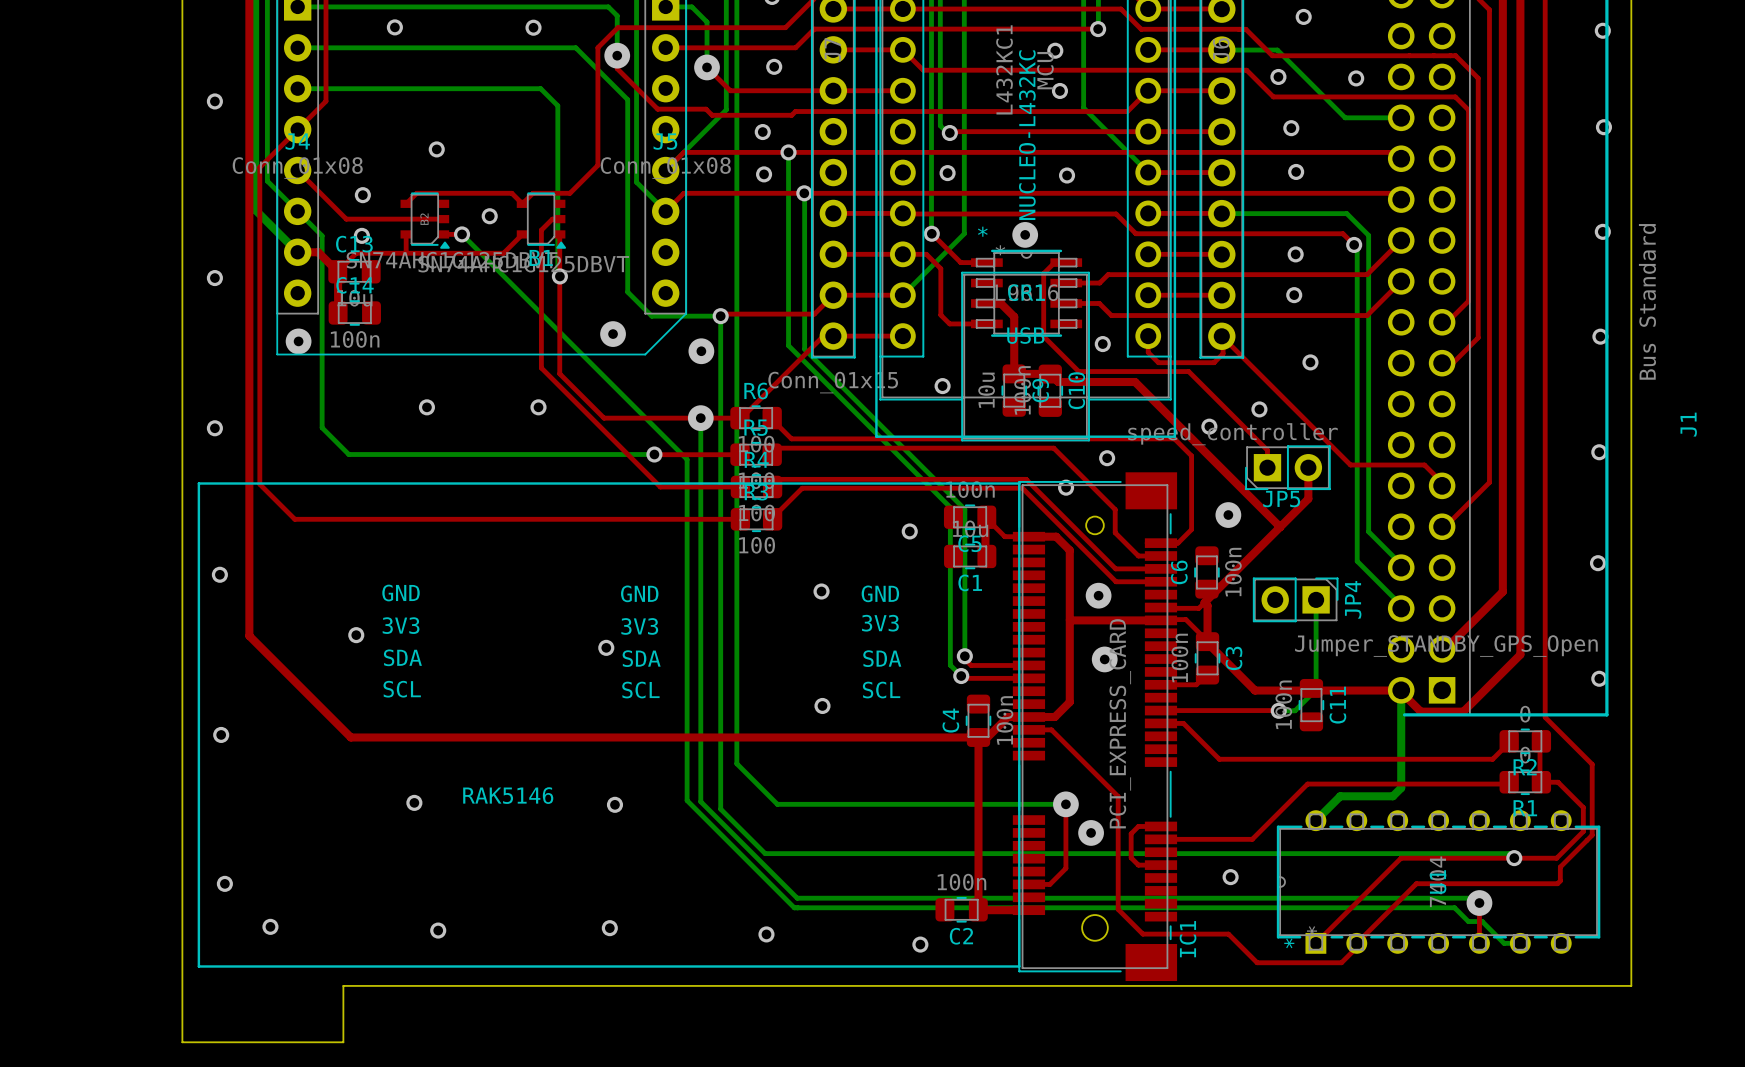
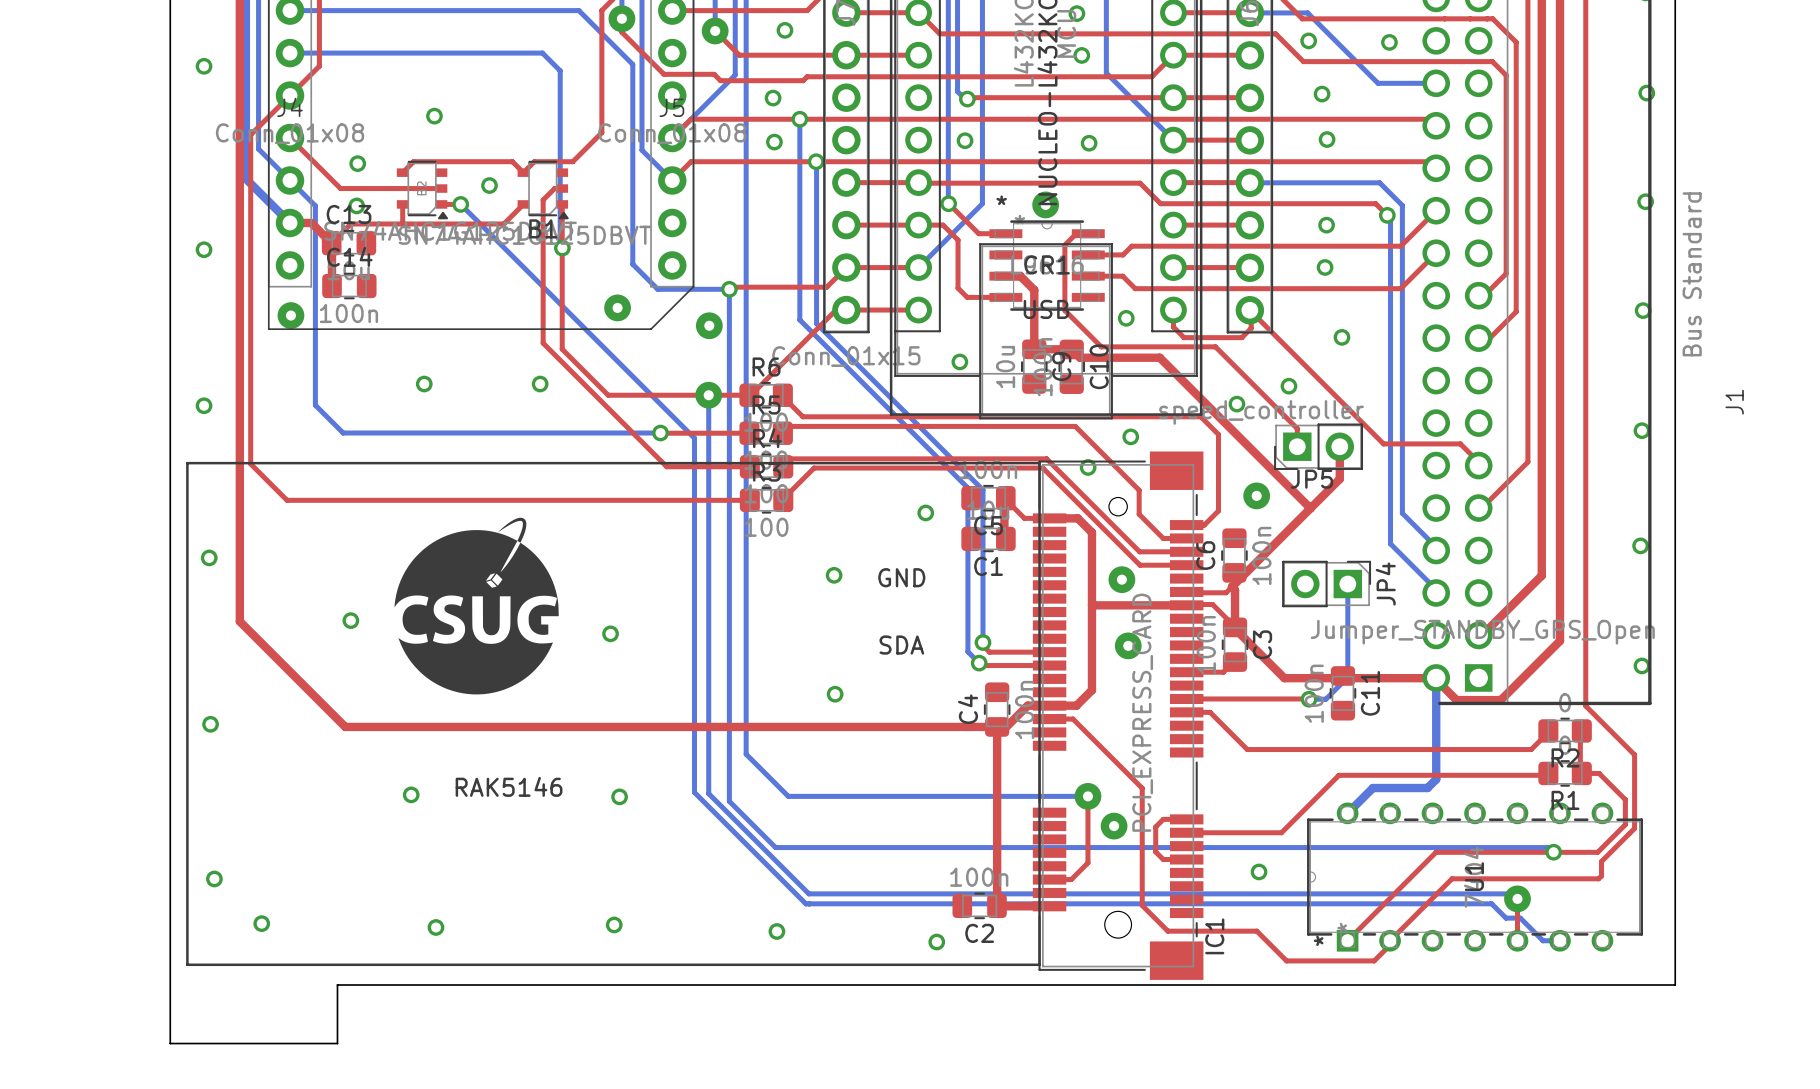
drawing: none -> [394, 517, 559, 695]
text: GND (401, 593) -> none
text: GND (639, 593) -> none
text: 3V3 (880, 623) -> none
text: 3V3 (401, 625) -> none
text: 3V3 (639, 626) -> none
text: SDA (402, 657) -> none
text: SDA (641, 658) -> none
text: SCL (402, 689) -> none
text: SCL (640, 690) -> none
text: SCL (881, 690) -> none

